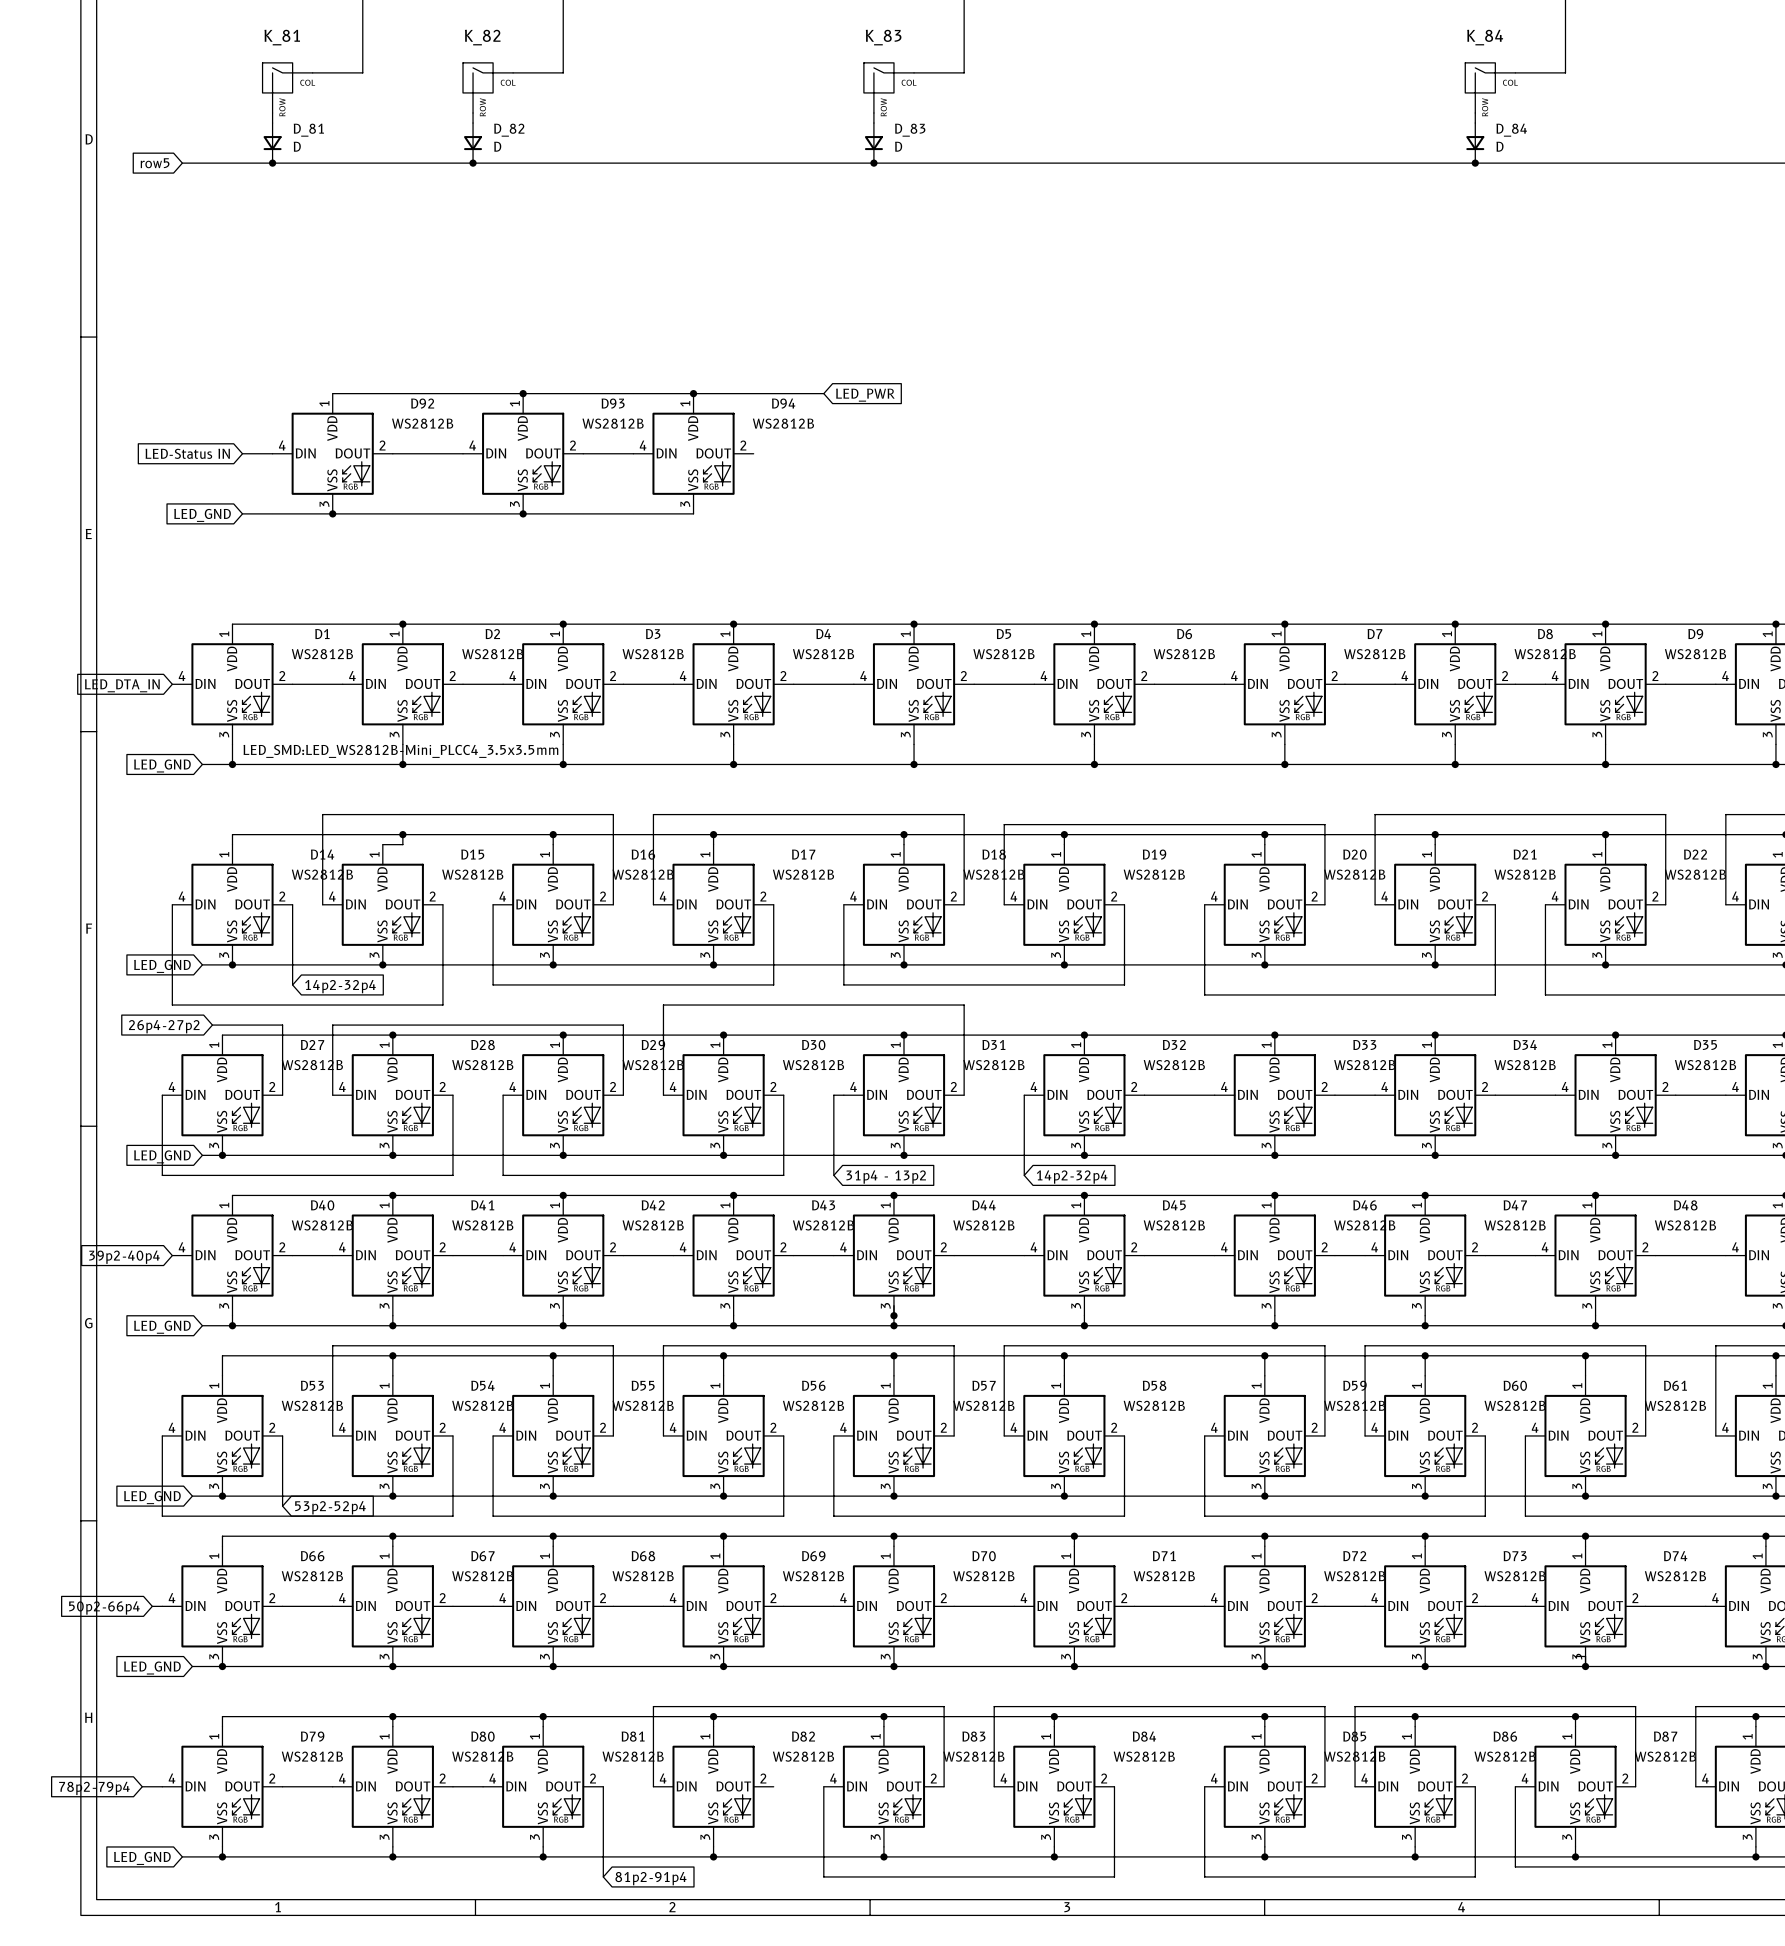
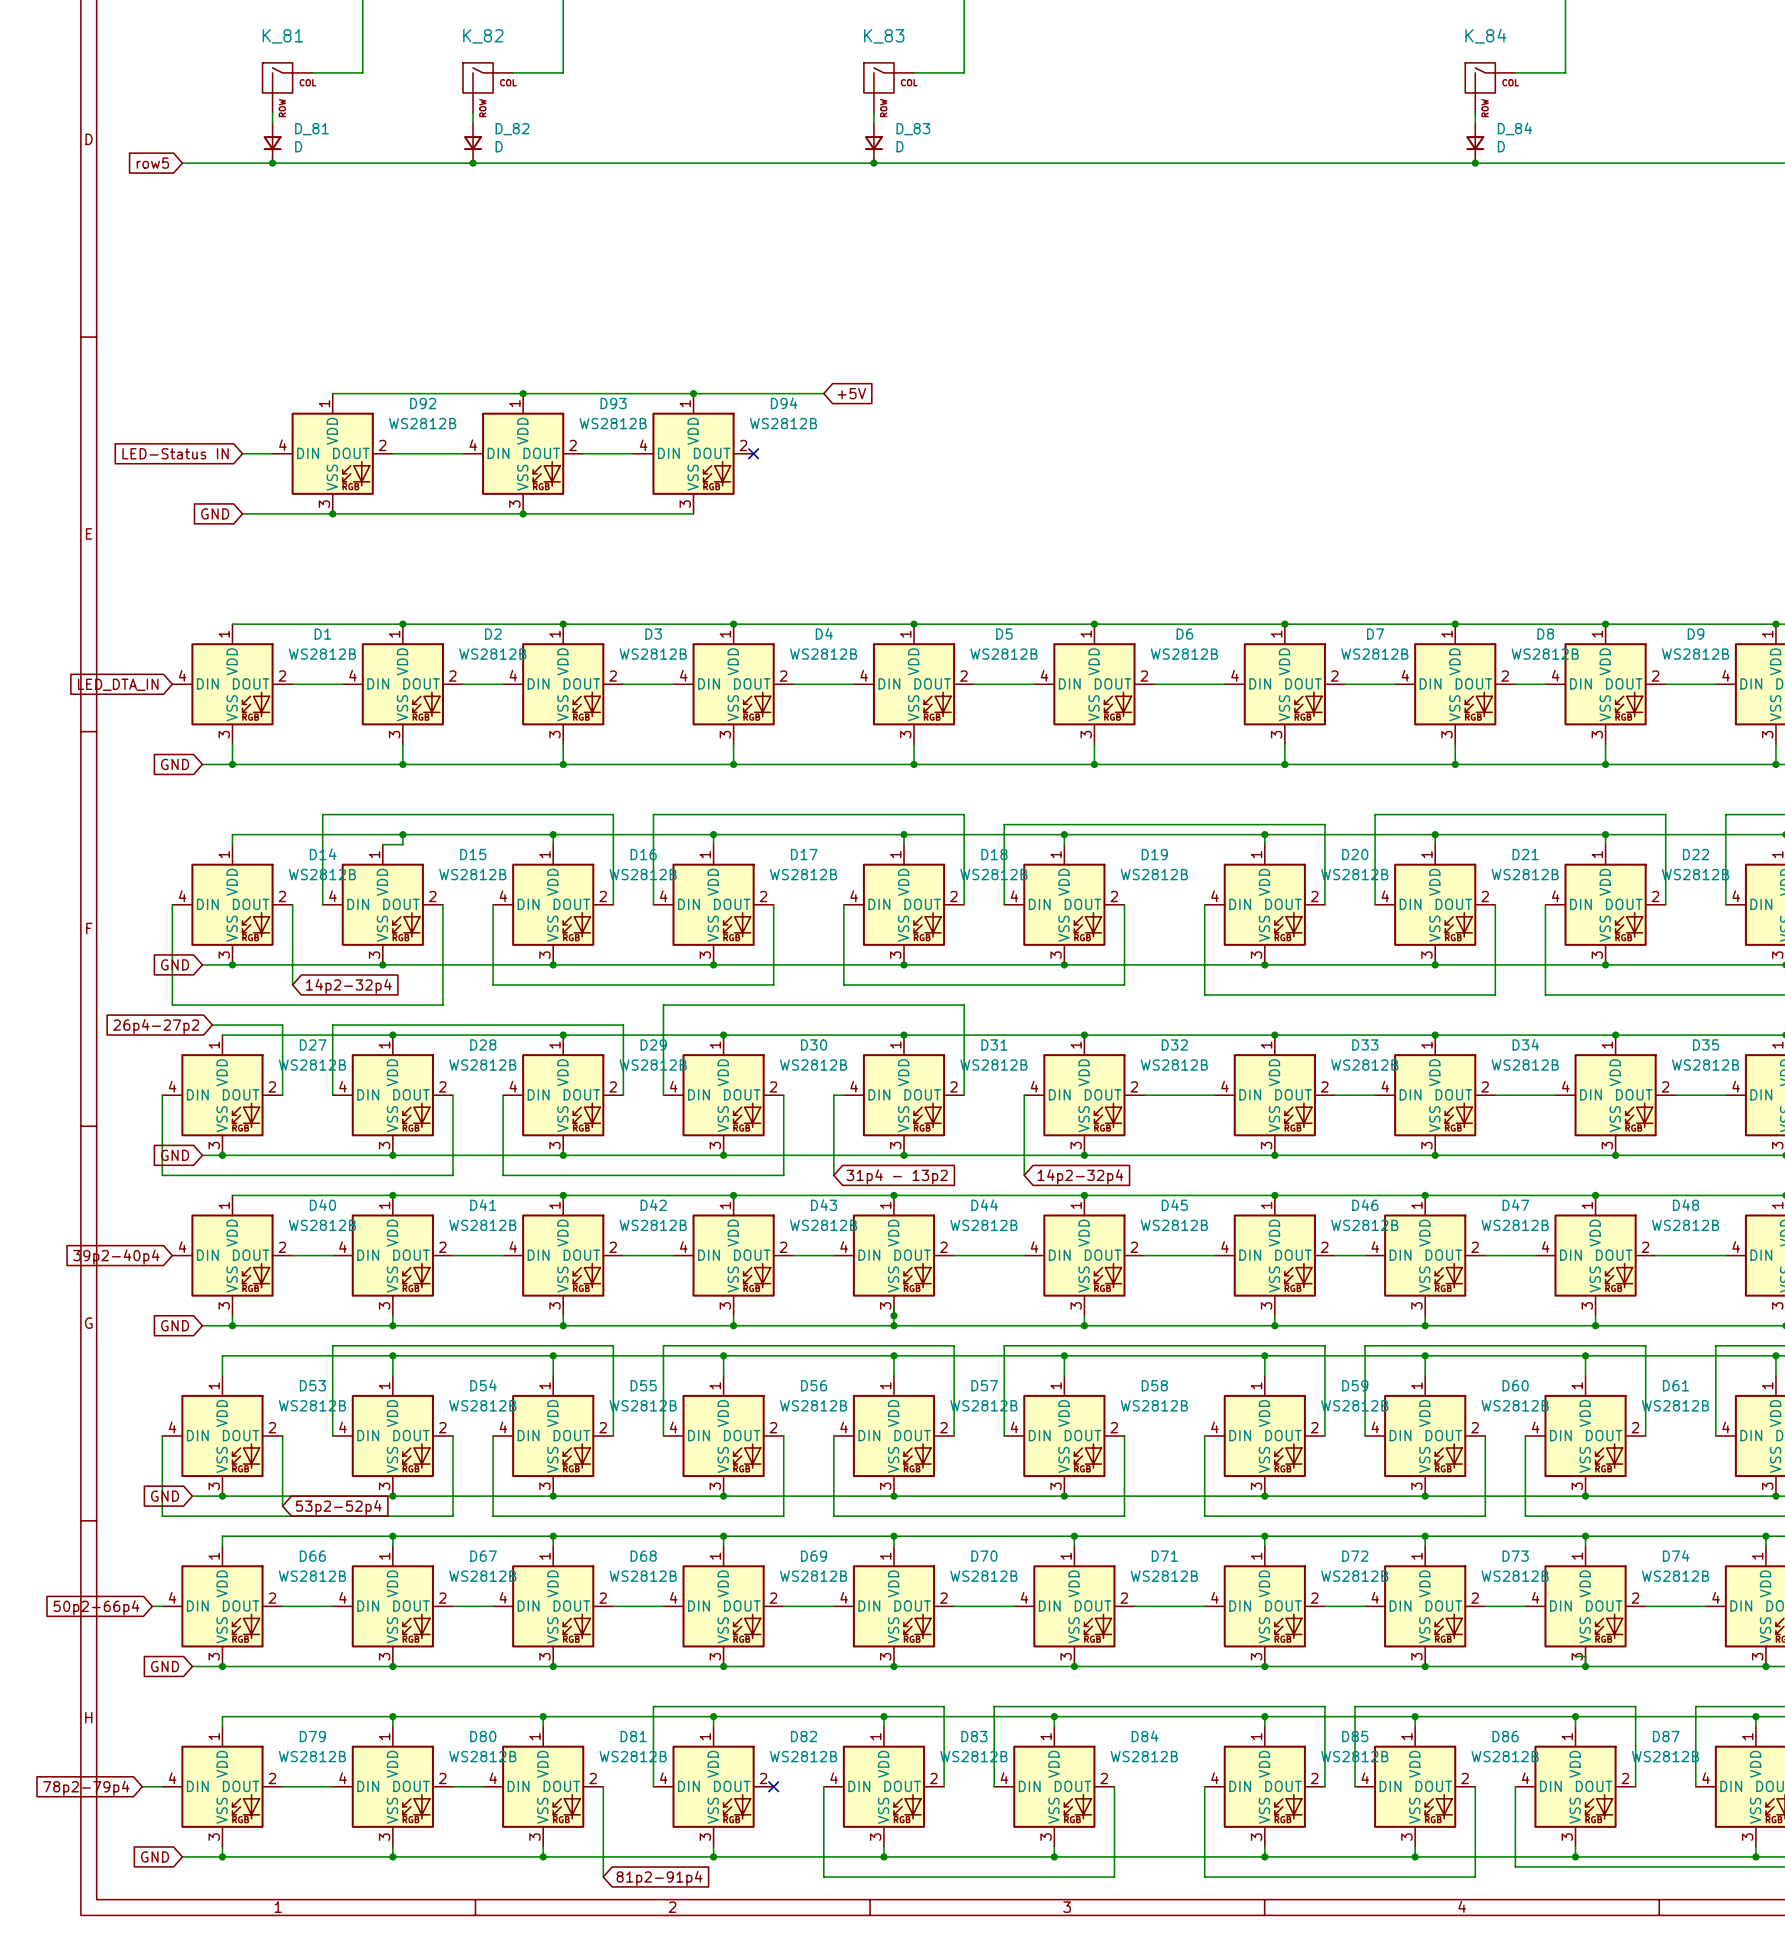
global label: LED_PWR (865, 395) -> +5V (851, 393)
no-connect mark: none -> (753, 453)
global label: LED_GND (202, 515) -> GND (215, 513)
D1 text: LED_SMD:LED_WS2812B-Mini_PLCC4_3.5x3.5mm (400, 751) -> none
global label: LED_GND (162, 765) -> GND (175, 764)
global label: LED_GND (162, 966) -> GND (175, 964)
global label: LED_GND (162, 1156) -> GND (175, 1155)
global label: LED_GND (162, 1327) -> GND (175, 1325)
global label: LED_GND (152, 1497) -> GND (165, 1496)
global label: LED_GND (152, 1668) -> GND (165, 1666)
no-connect mark: none -> (773, 1786)
global label: LED_GND (142, 1858) -> GND (155, 1856)

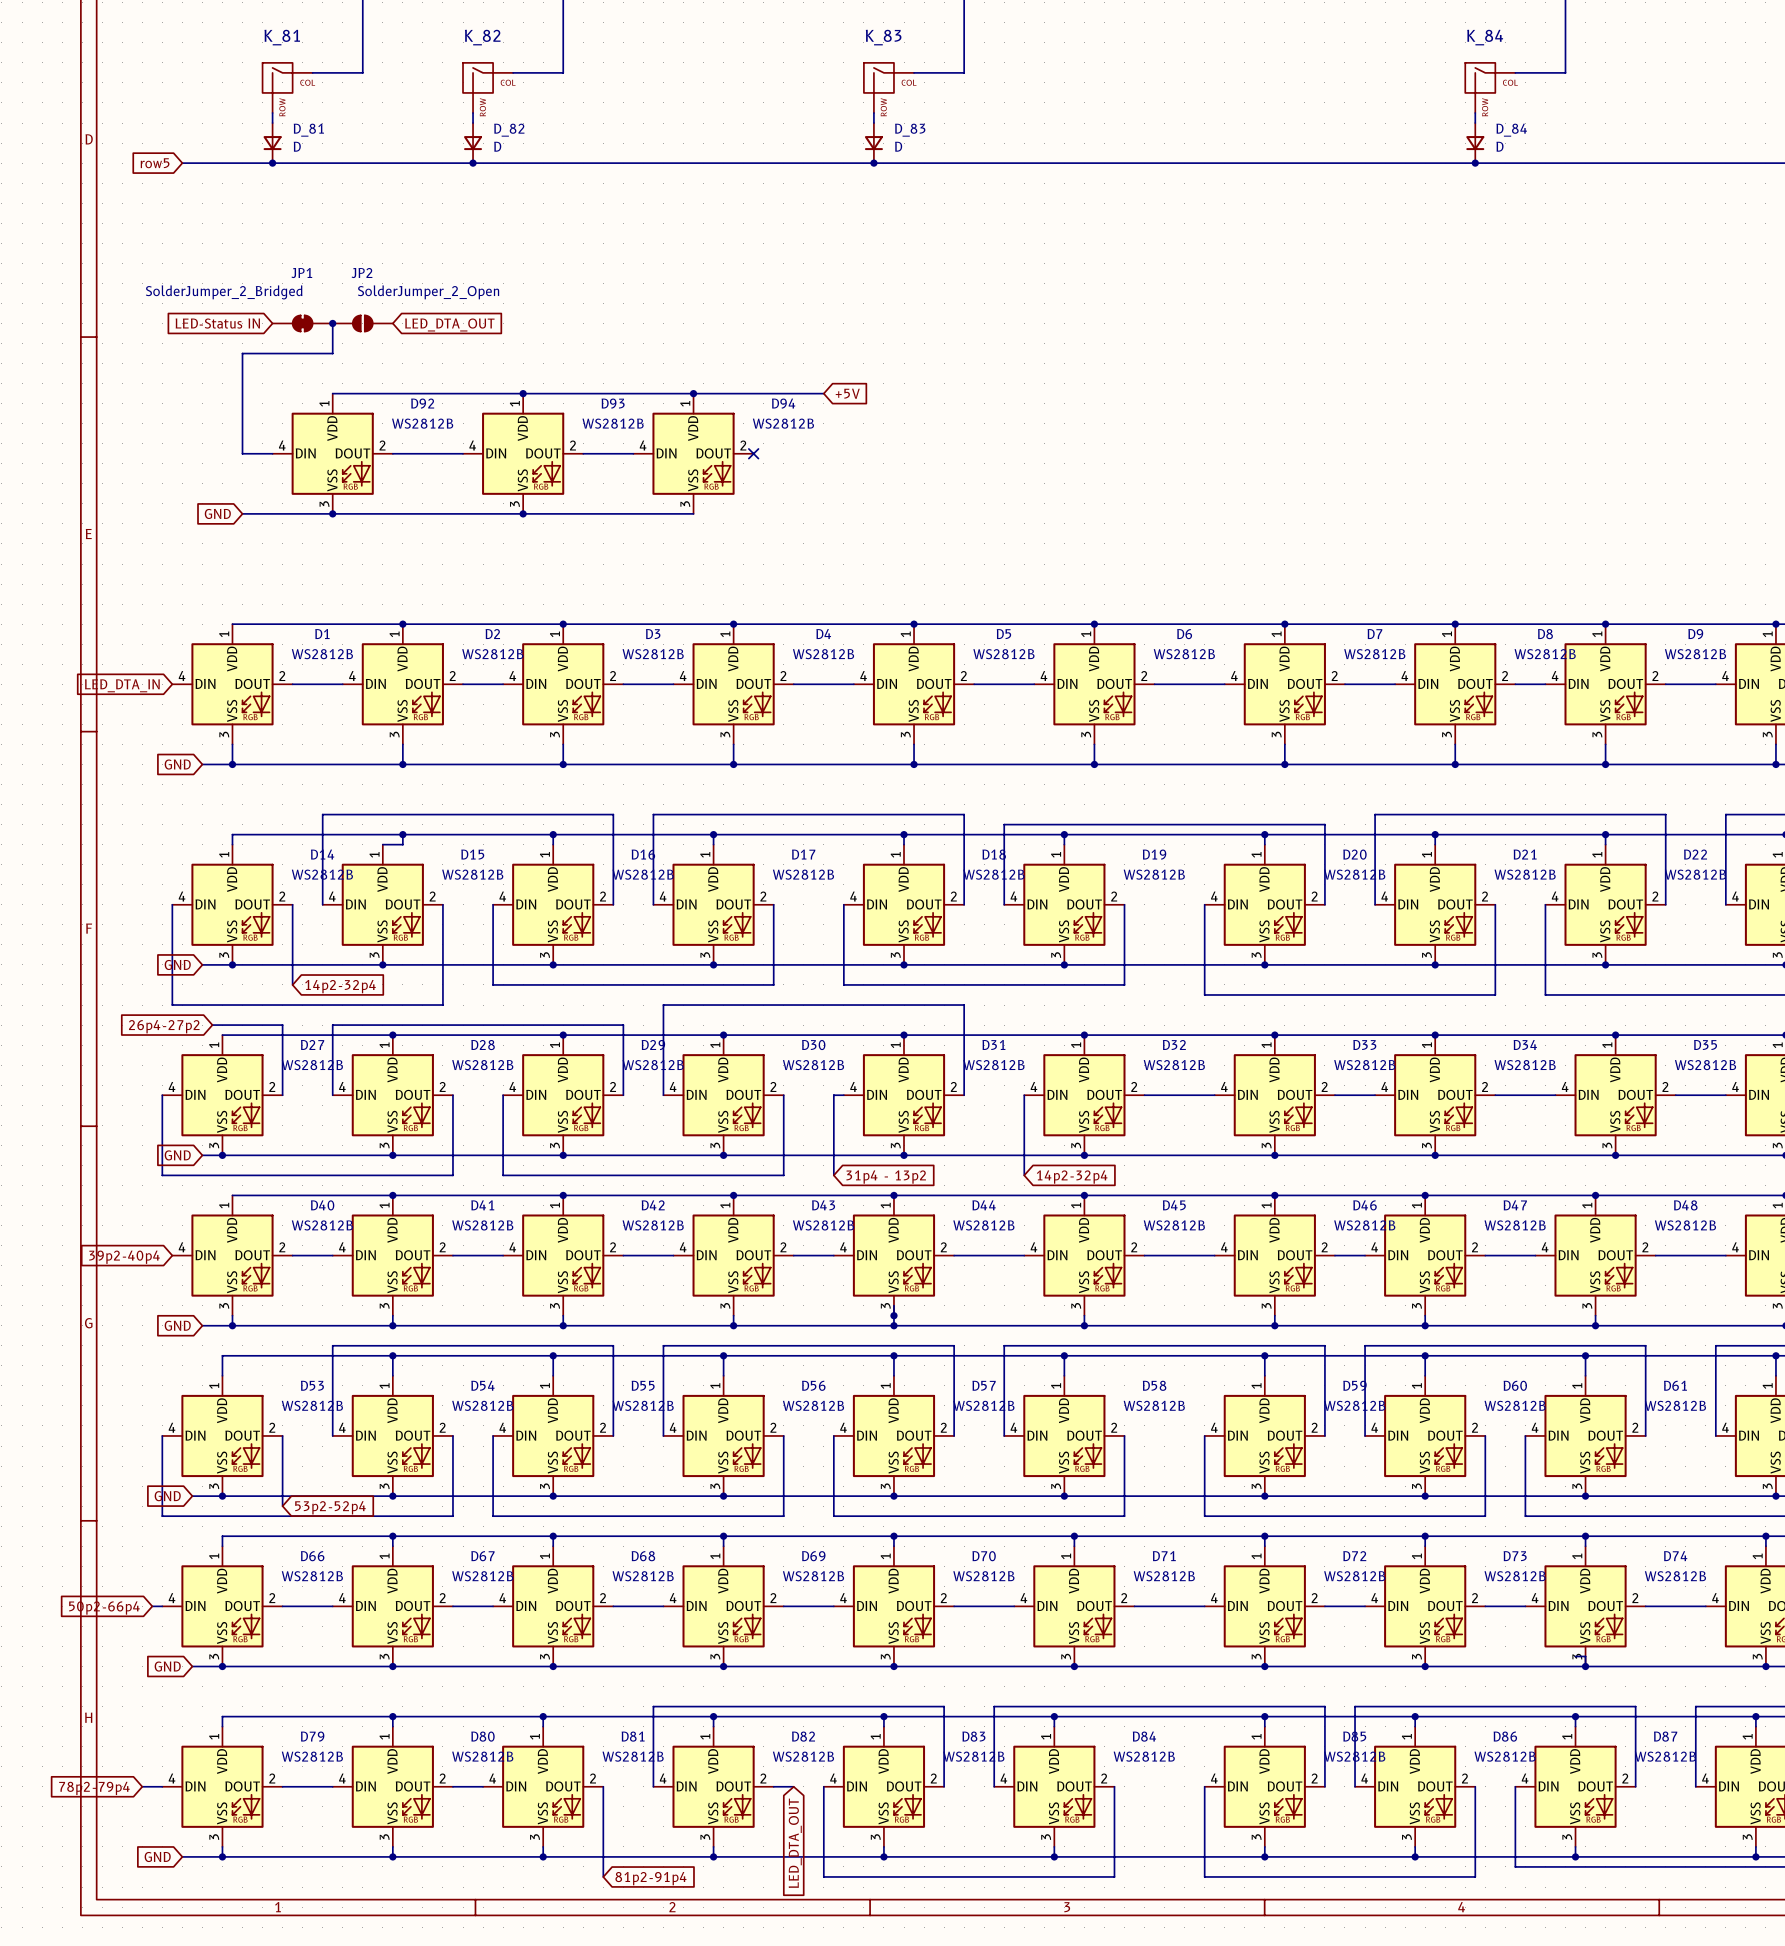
JP1: none -> SolderJumper_2_Bridged (302, 323)
wire: none -> (332, 323) (332, 353) (242, 353) (242, 453)
junction: none -> (332, 323)
JP2: none -> SolderJumper_2_Open (362, 323)
global label: none -> LED_DTA_OUT (449, 324)
global label position: LED-Status IN (175, 453) -> LED-Status IN (217, 323)
wire: none -> (773, 1786) (793, 1786)
no-connect mark: (773, 1786) -> none
global label: none -> LED_DTA_OUT (795, 1843)

